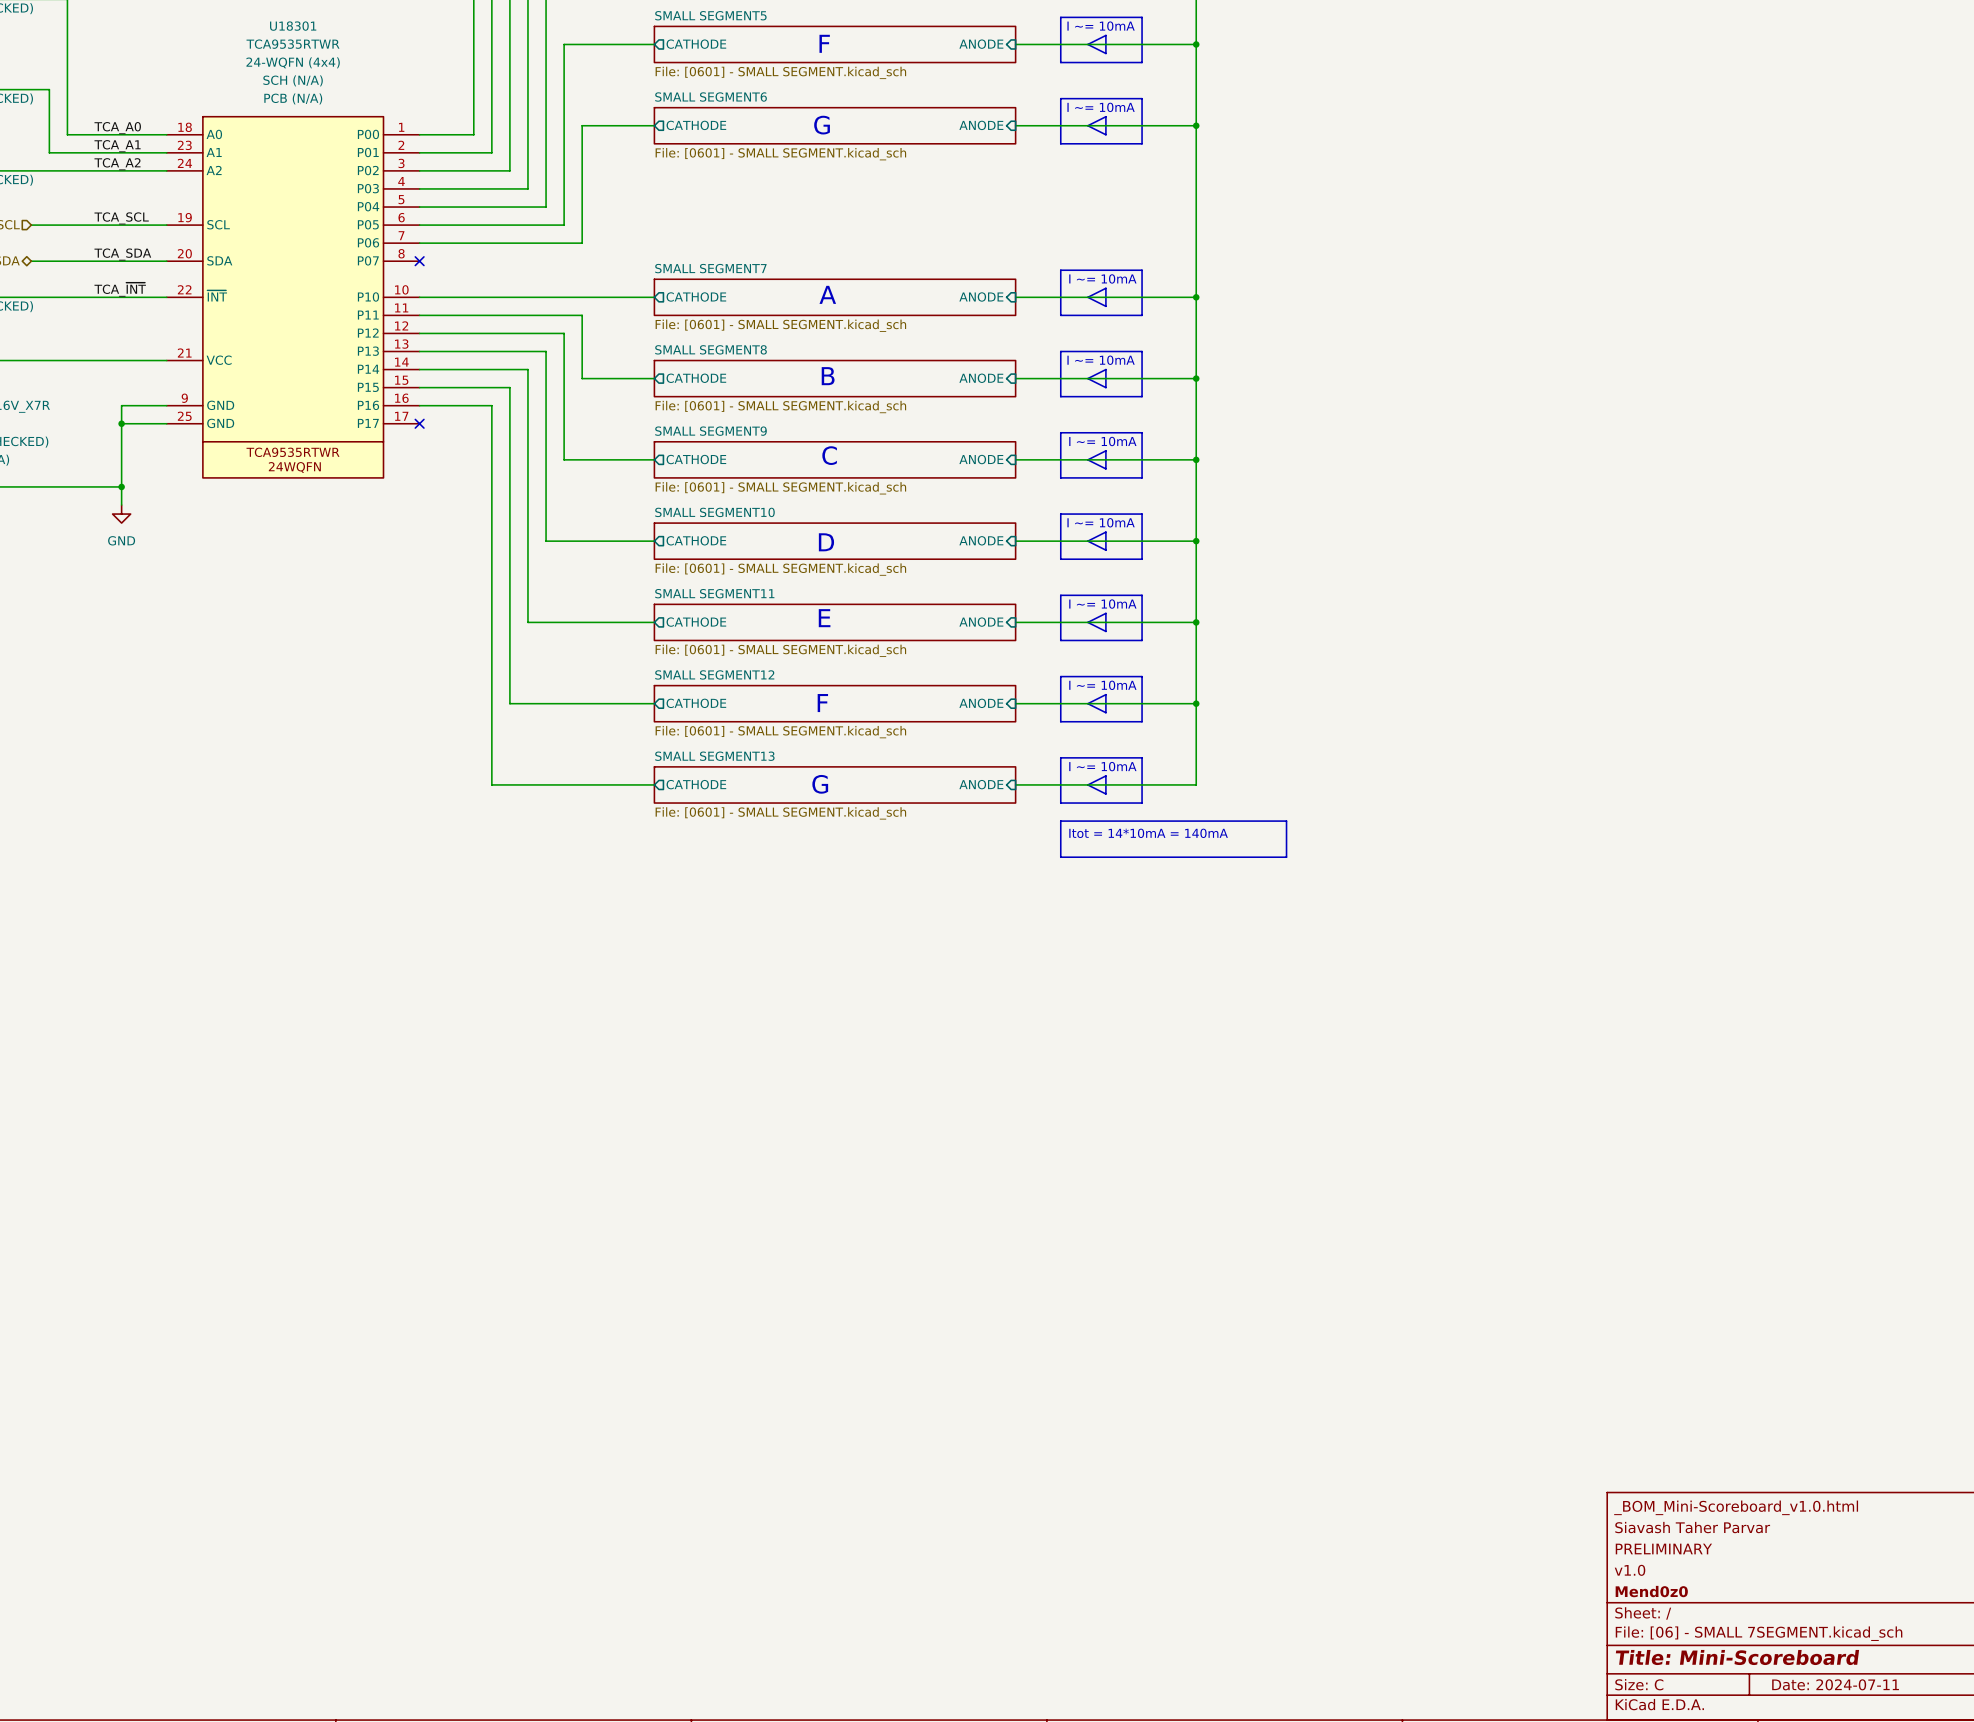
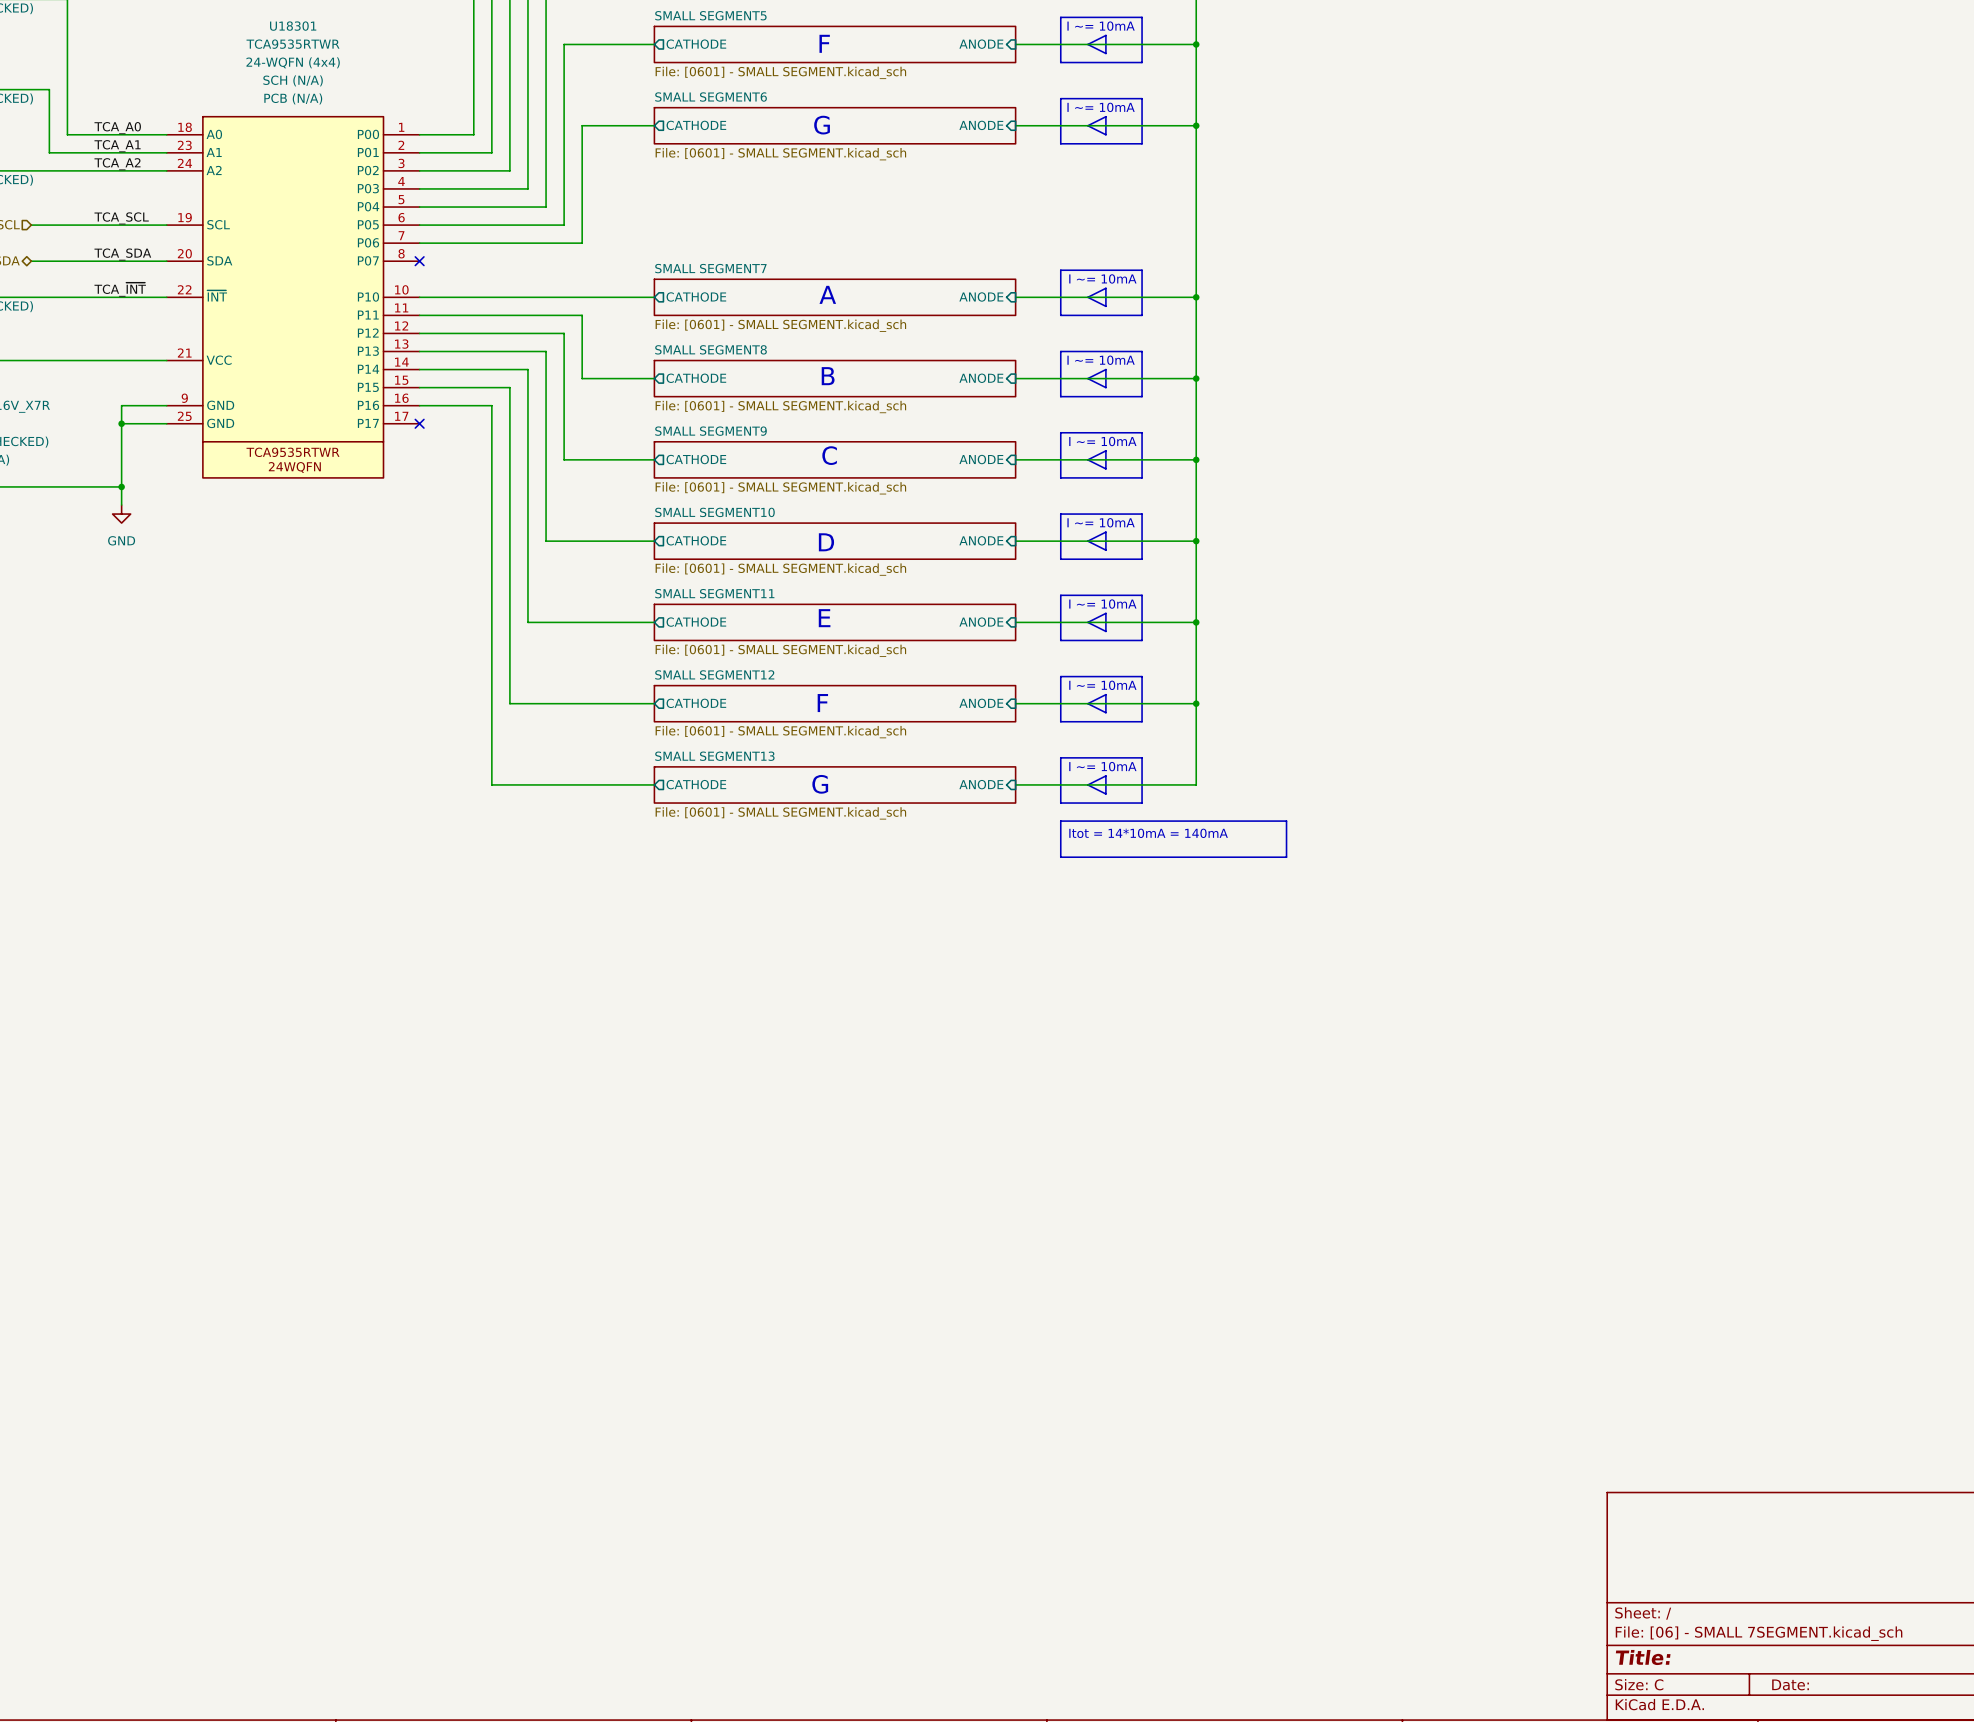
title block: _BOM_Mini-Scoreboard_v1.0.html (1736, 1507) -> none
title block: Siavash Taher Parvar (1692, 1527) -> none
title block: PRELIMINARY (1663, 1549) -> none
title block: v1.0 (1630, 1570) -> none
title block: Mend0z0 (1651, 1591) -> none
title block: Title: Mini-Scoreboard (1737, 1657) -> Title: (1643, 1657)
title block: Date: 2024-07-11 (1835, 1684) -> Date: (1790, 1684)

